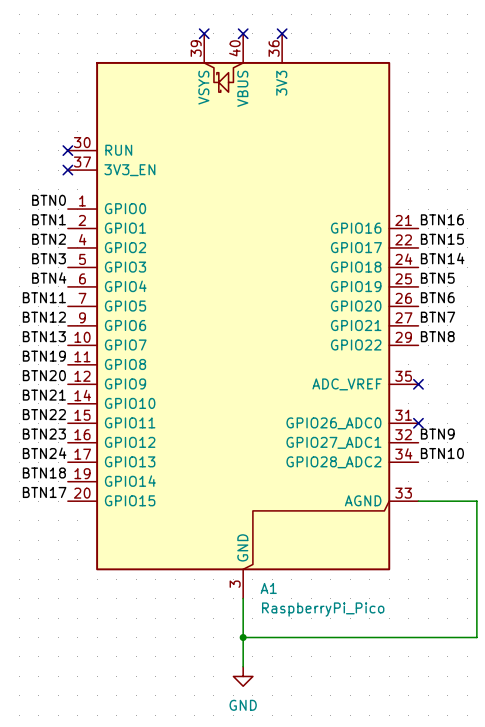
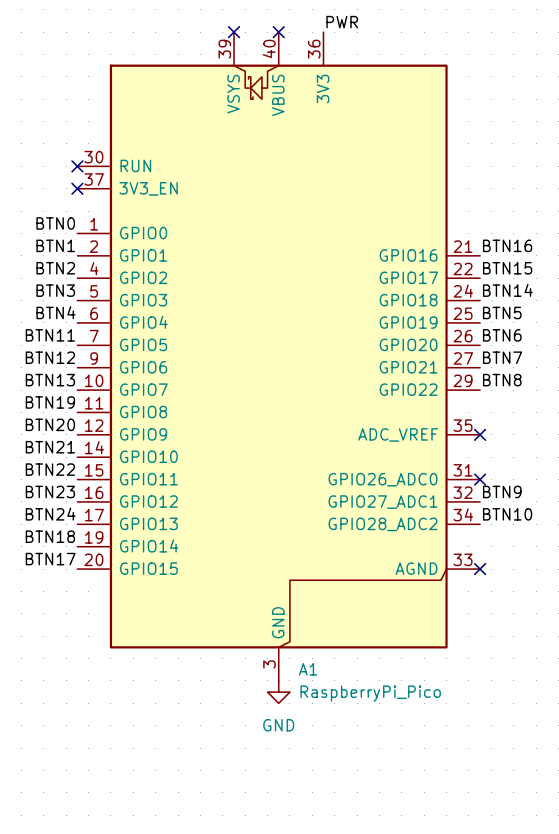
label: none -> PWR (342, 22)
no-connect mark: (282, 33) -> none
wire: (418, 501) (476, 501) (476, 637) (243, 637) -> none
no-connect mark: none -> (480, 569)
wire: (243, 598) (243, 666) -> none
junction: (243, 637) -> none
power symbol position: GND (243, 676) -> GND (278, 692)

